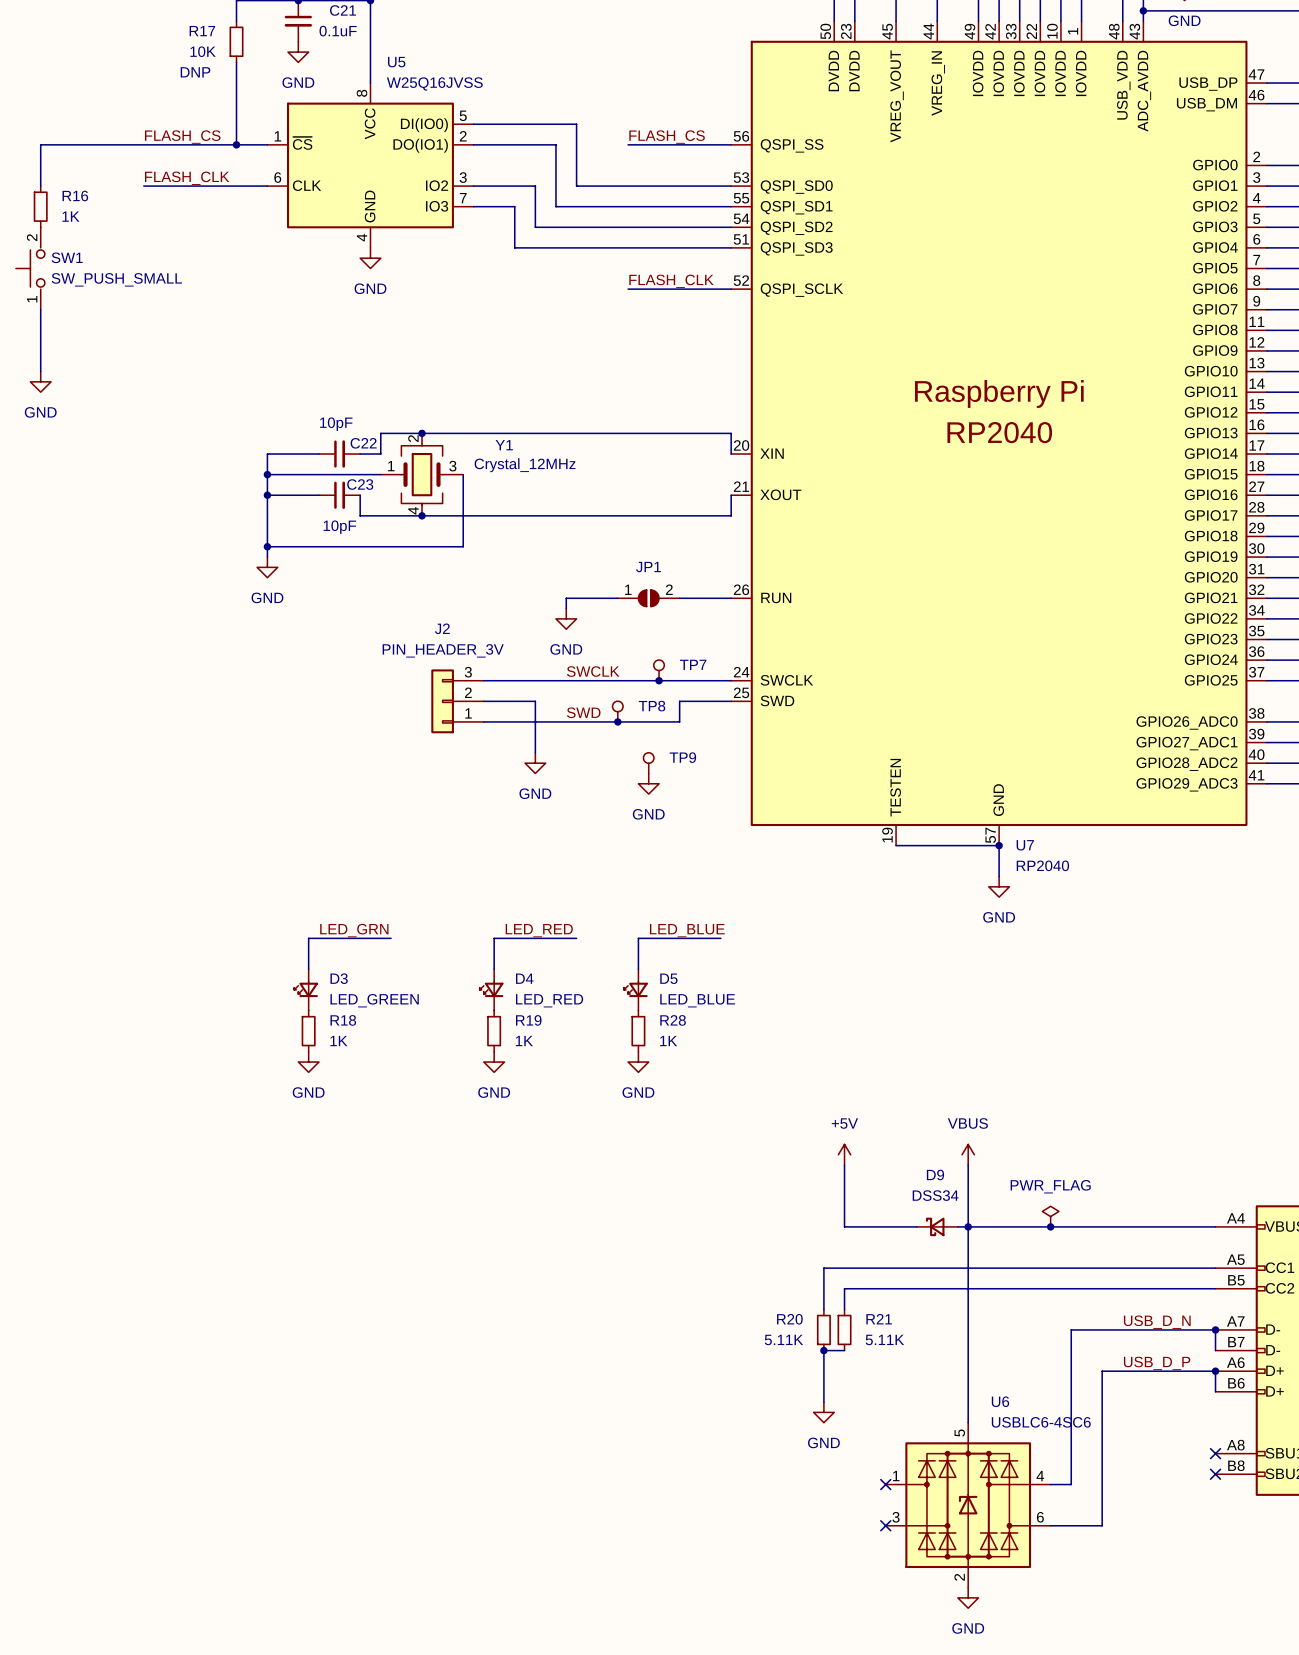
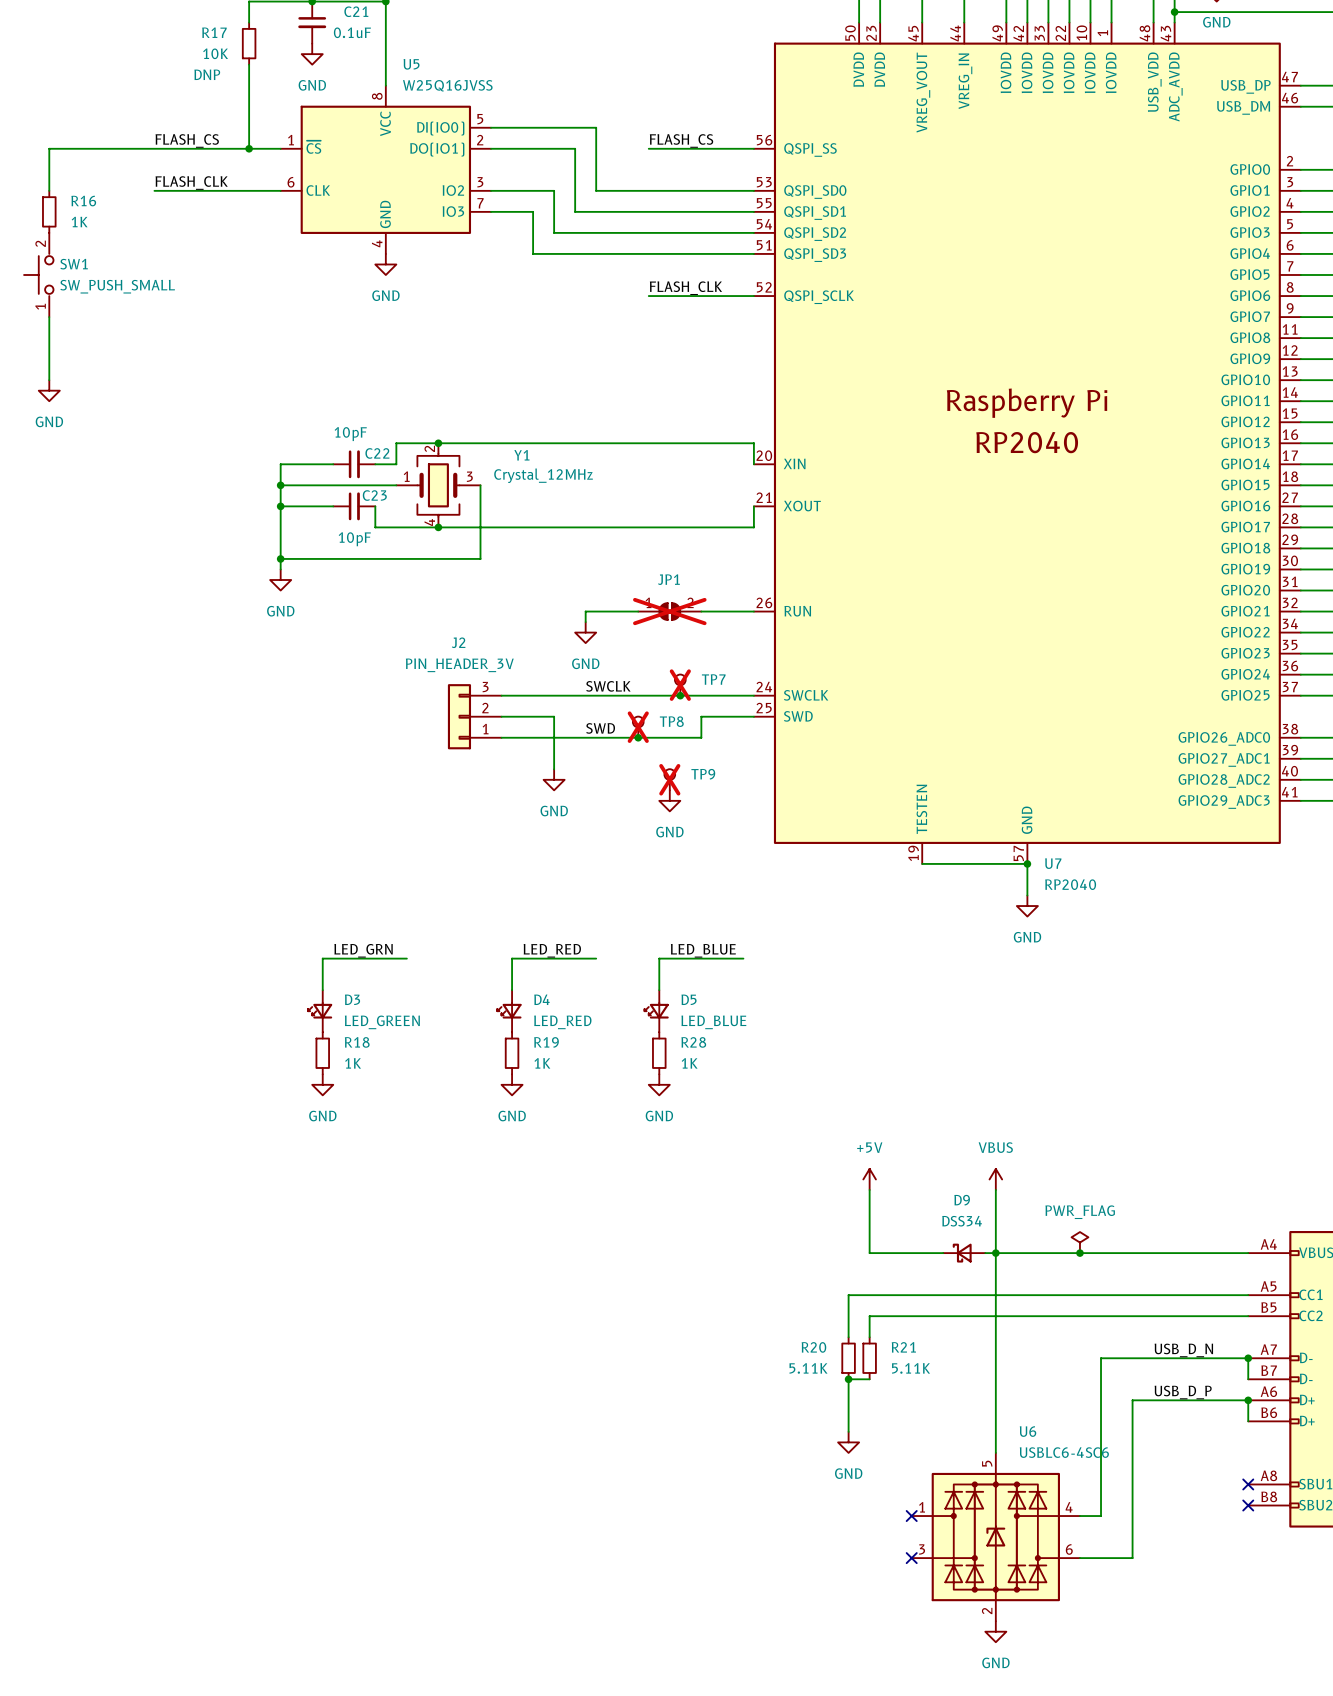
JP1 do-not-place cross: none -> (669, 611)
TP7 do-not-place cross: none -> (680, 685)
TP8 do-not-place cross: none -> (638, 727)
TP9 do-not-place cross: none -> (669, 779)

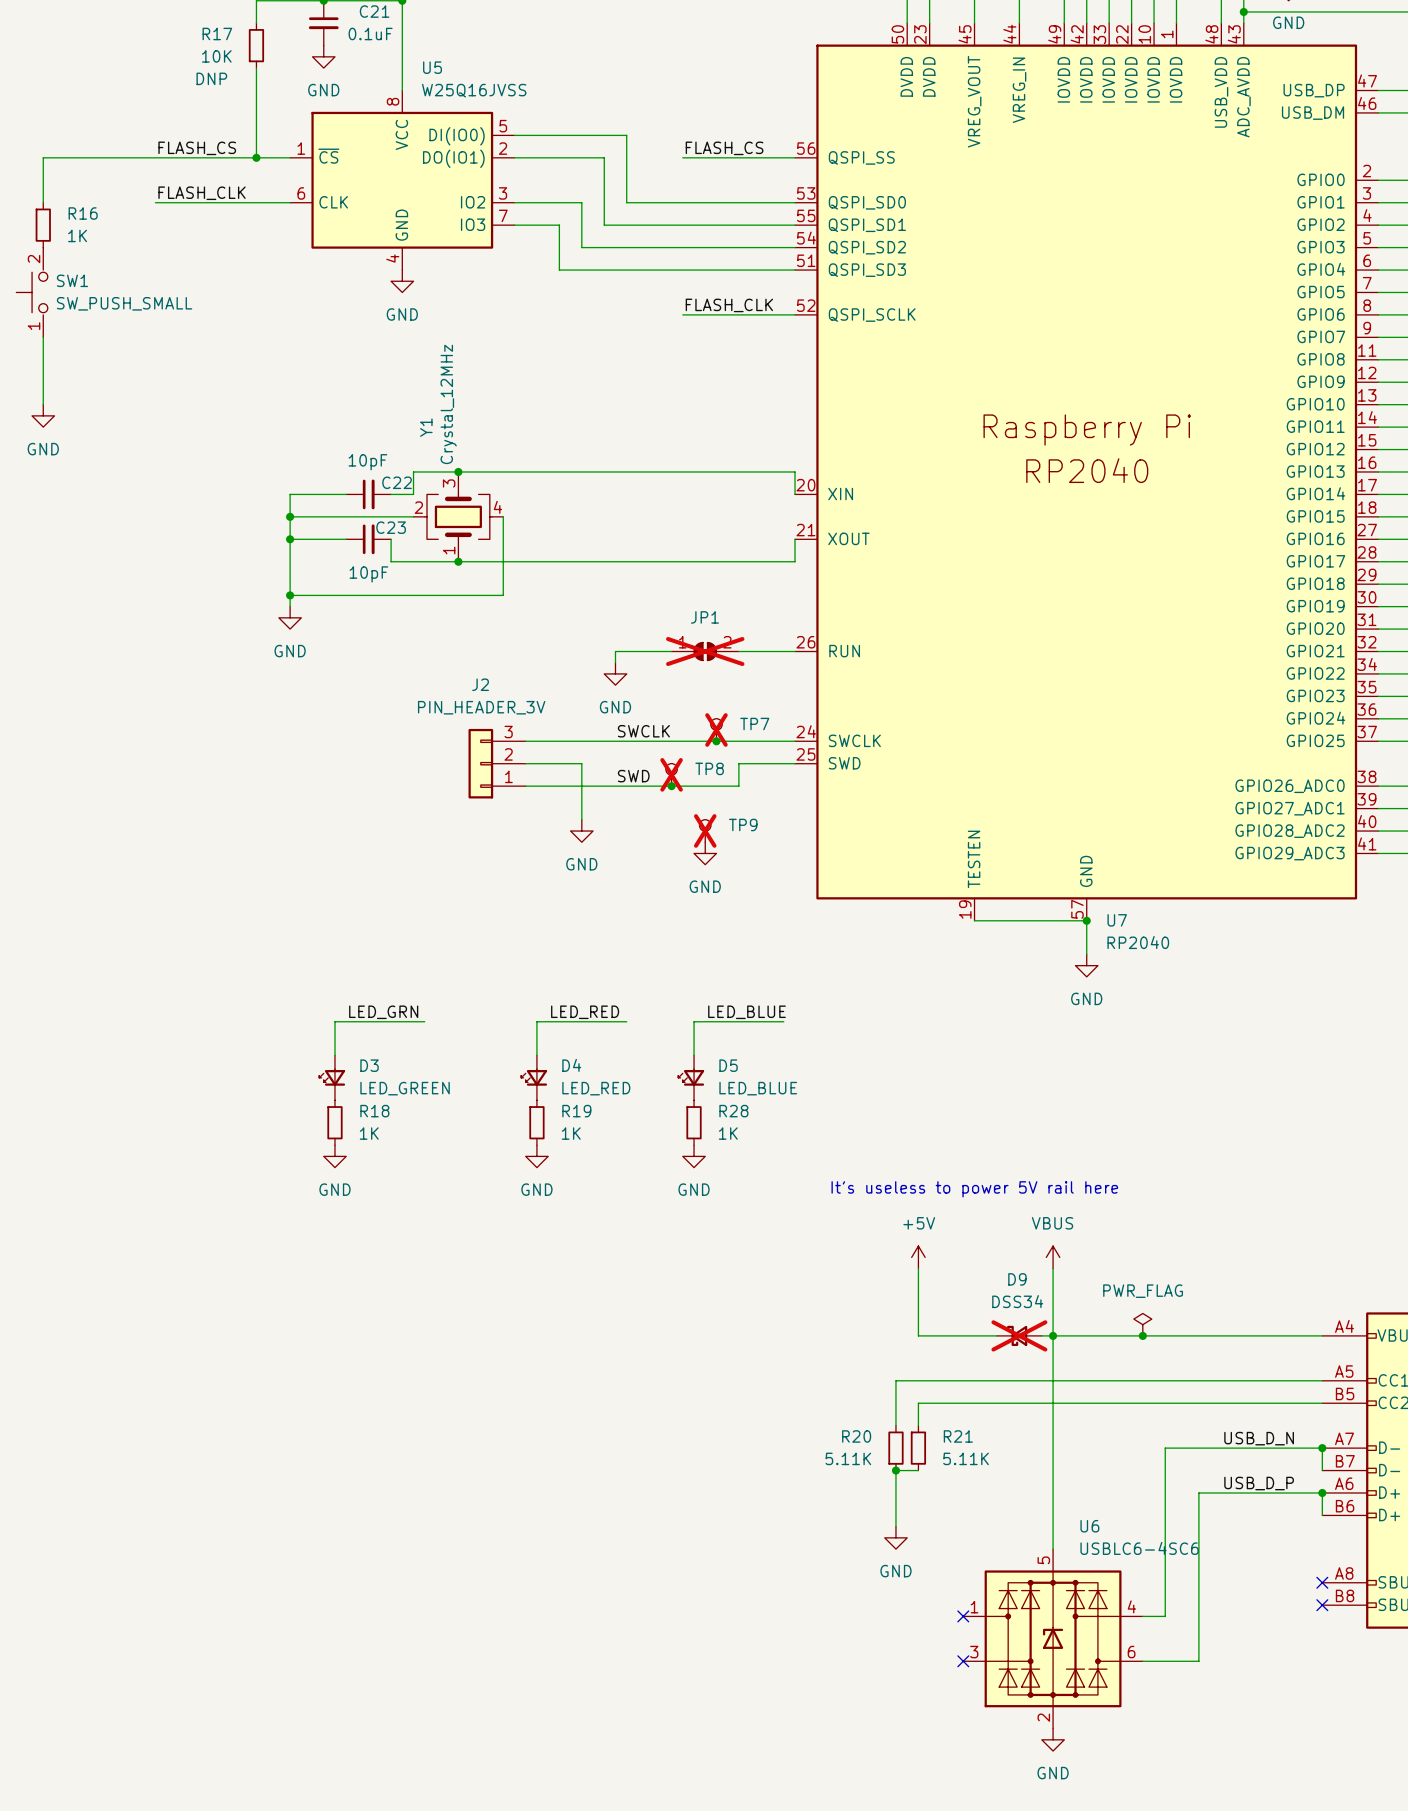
Y1 rotation: 0° (438, 485) -> 90° counterclockwise (458, 516)
text: none -> It's useless to power 5V rail here (974, 1189)
D9 do-not-place cross: none -> (1019, 1335)

